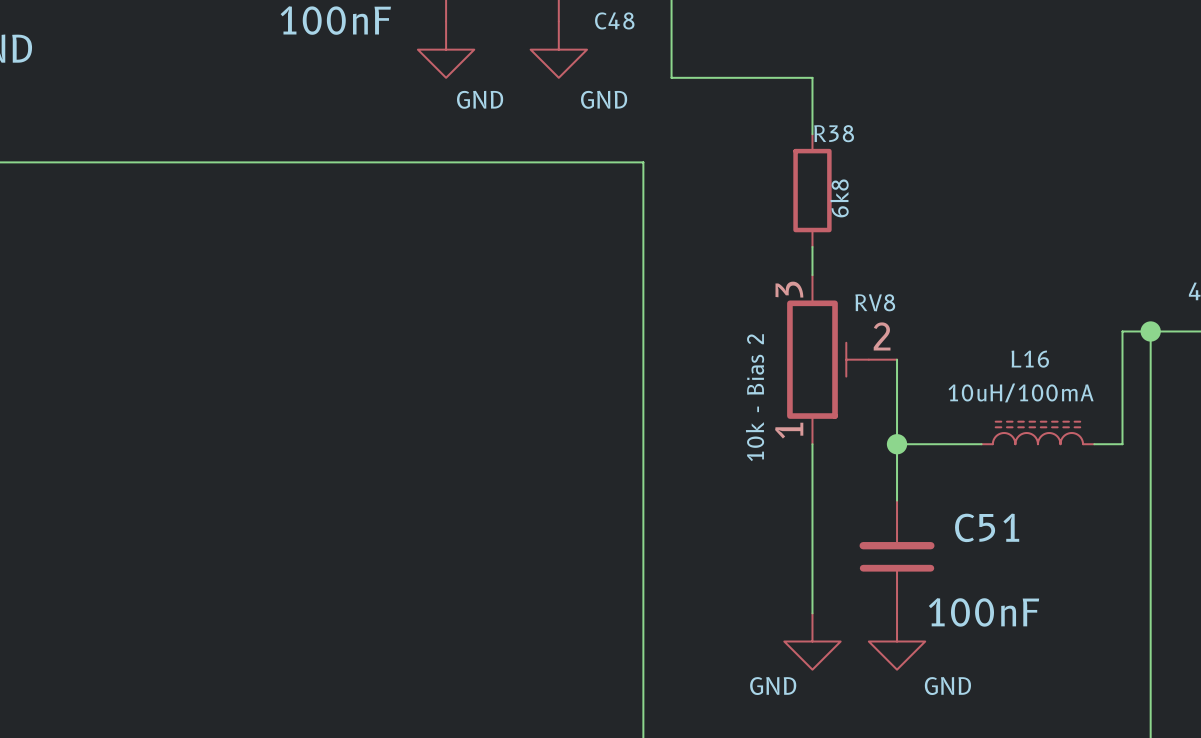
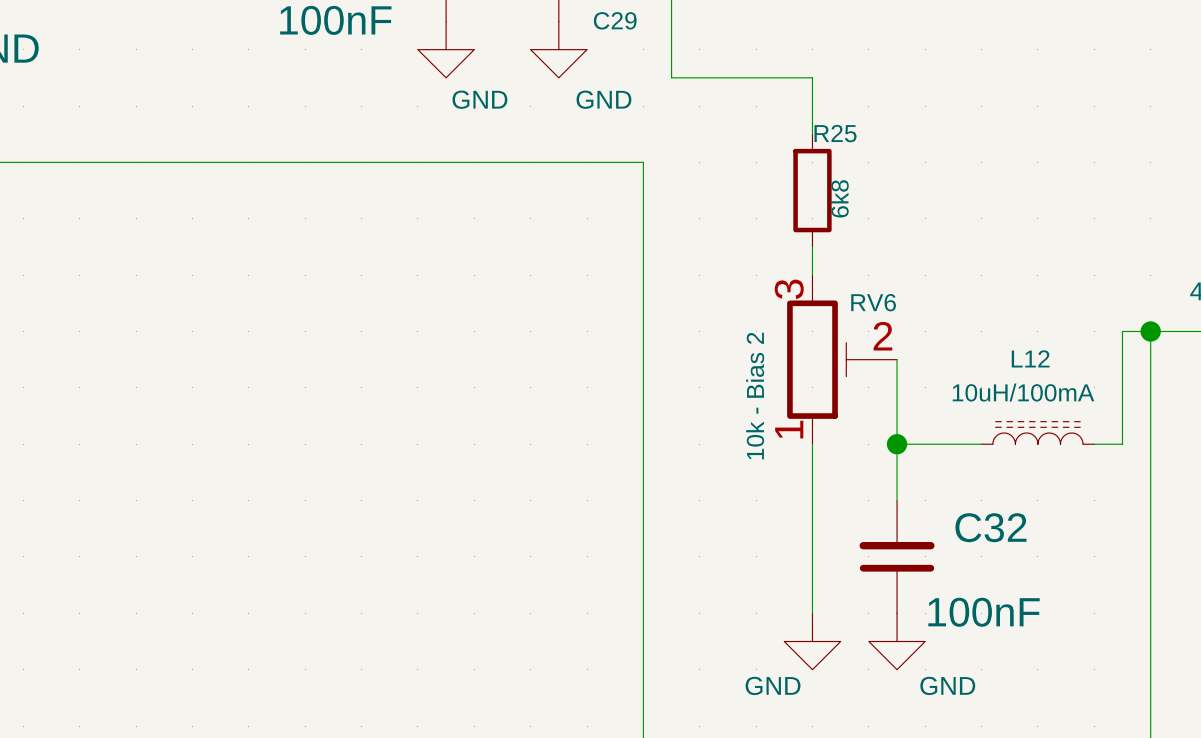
C48 name: C48 (614, 20) -> C29 (615, 20)
R38 name: R38 (834, 133) -> R25 (835, 133)
RV8 name: RV8 (875, 302) -> RV6 (873, 302)
L16 name: L16 (1030, 359) -> L12 (1030, 358)
C51 name: C51 (987, 527) -> C32 (990, 527)

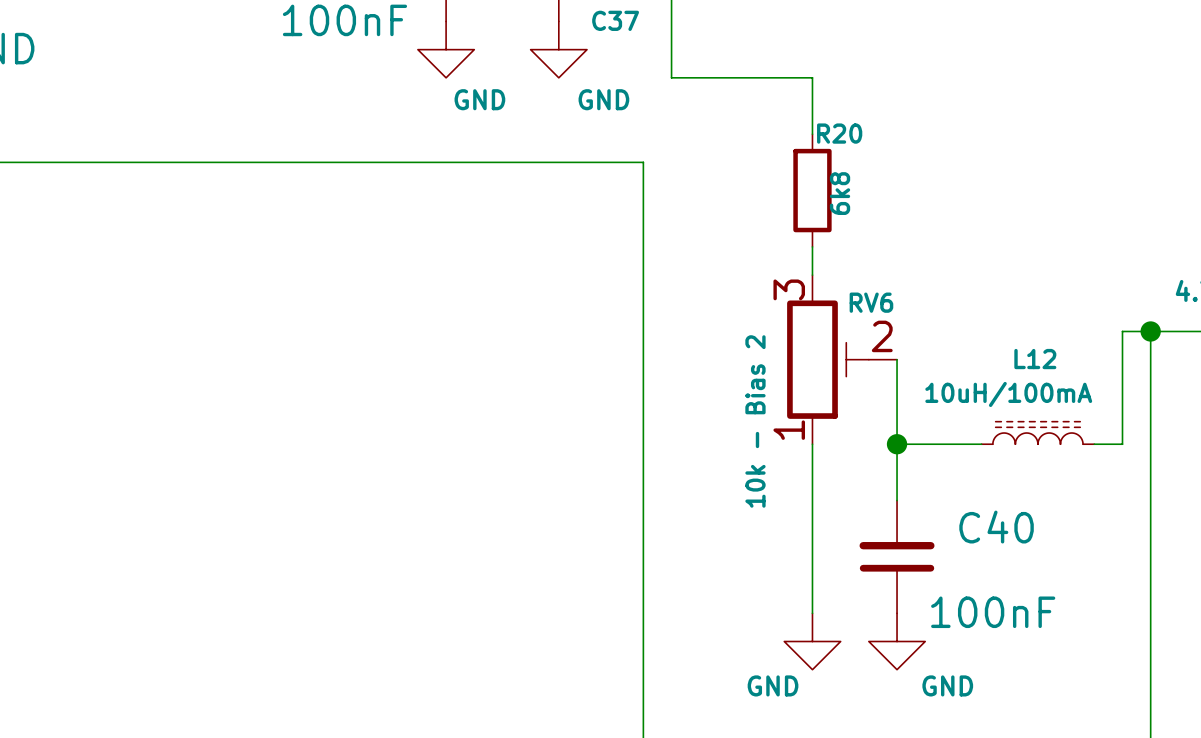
C29 name: C29 (615, 20) -> C37 (615, 20)
R25 name: R25 (835, 133) -> R20 (839, 133)
C32 name: C32 (990, 527) -> C40 (996, 527)

